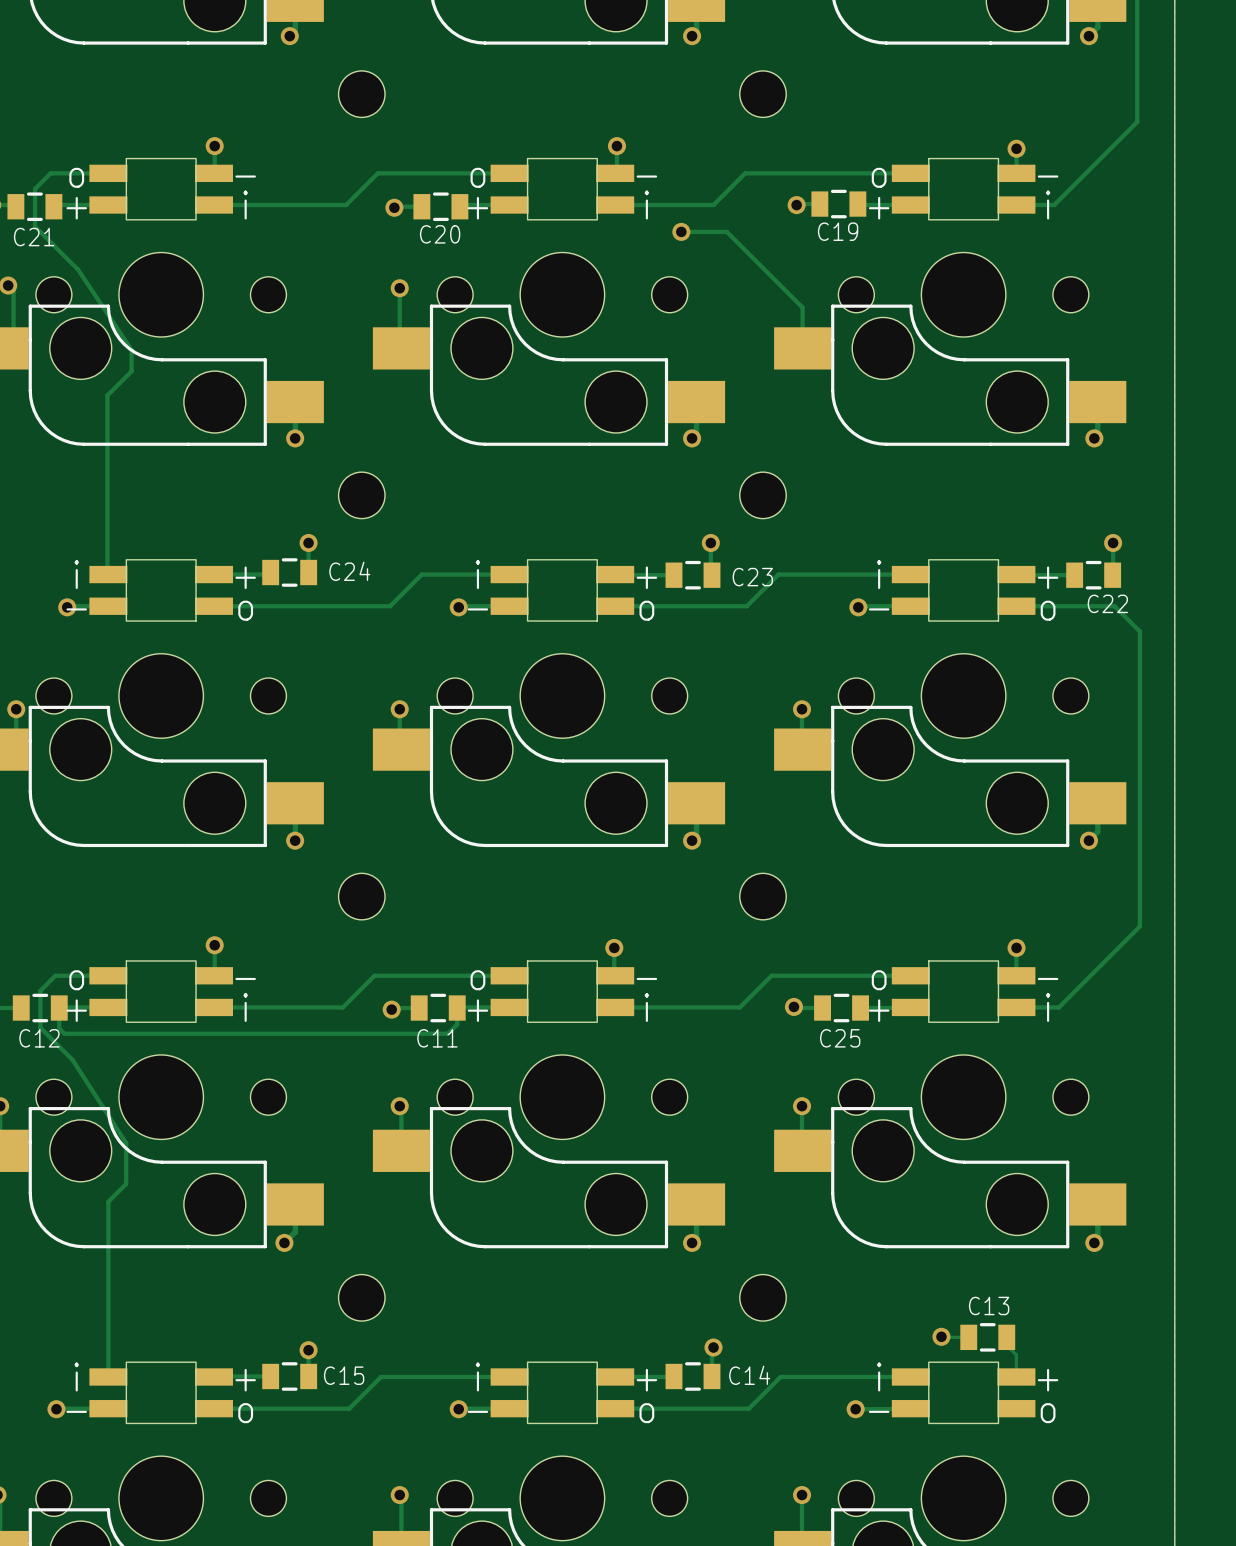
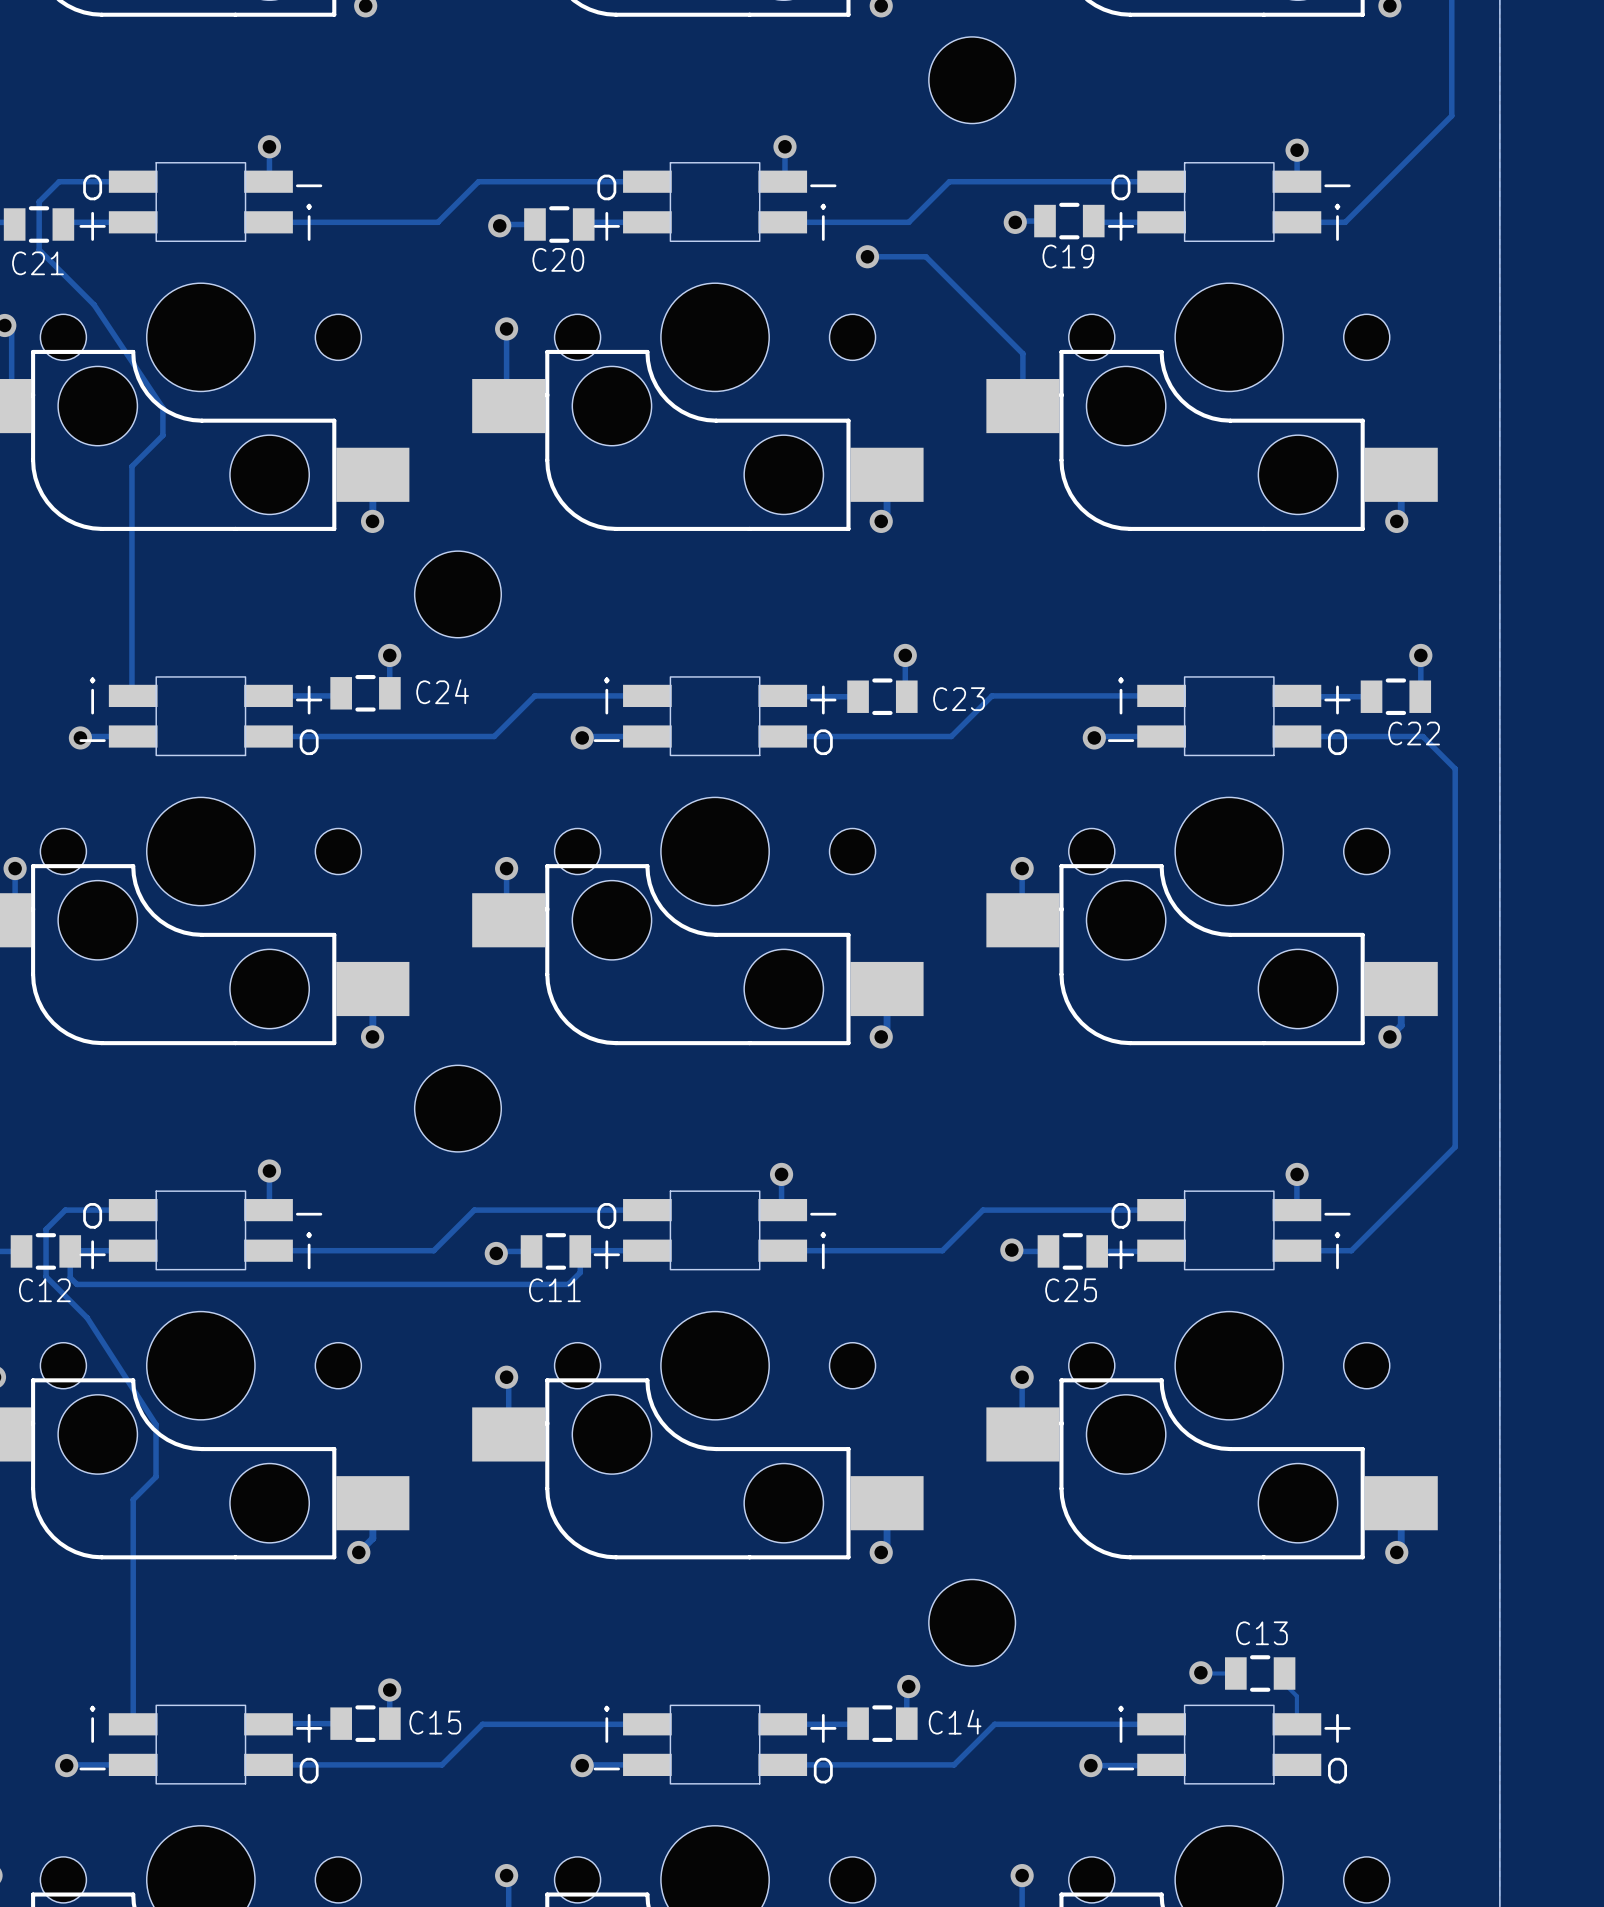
part footprint: [739, 70, 787, 118] -> [928, 36, 1016, 124]
part: (361, 94) -> none
part footprint: [338, 472, 386, 519] -> [414, 551, 502, 638]
part: (763, 495) -> none
part footprint: [338, 873, 386, 920] -> [414, 1065, 502, 1152]
part: (763, 896) -> none
part footprint: [739, 1274, 787, 1322] -> [928, 1579, 1016, 1667]
part: (361, 1297) -> none

